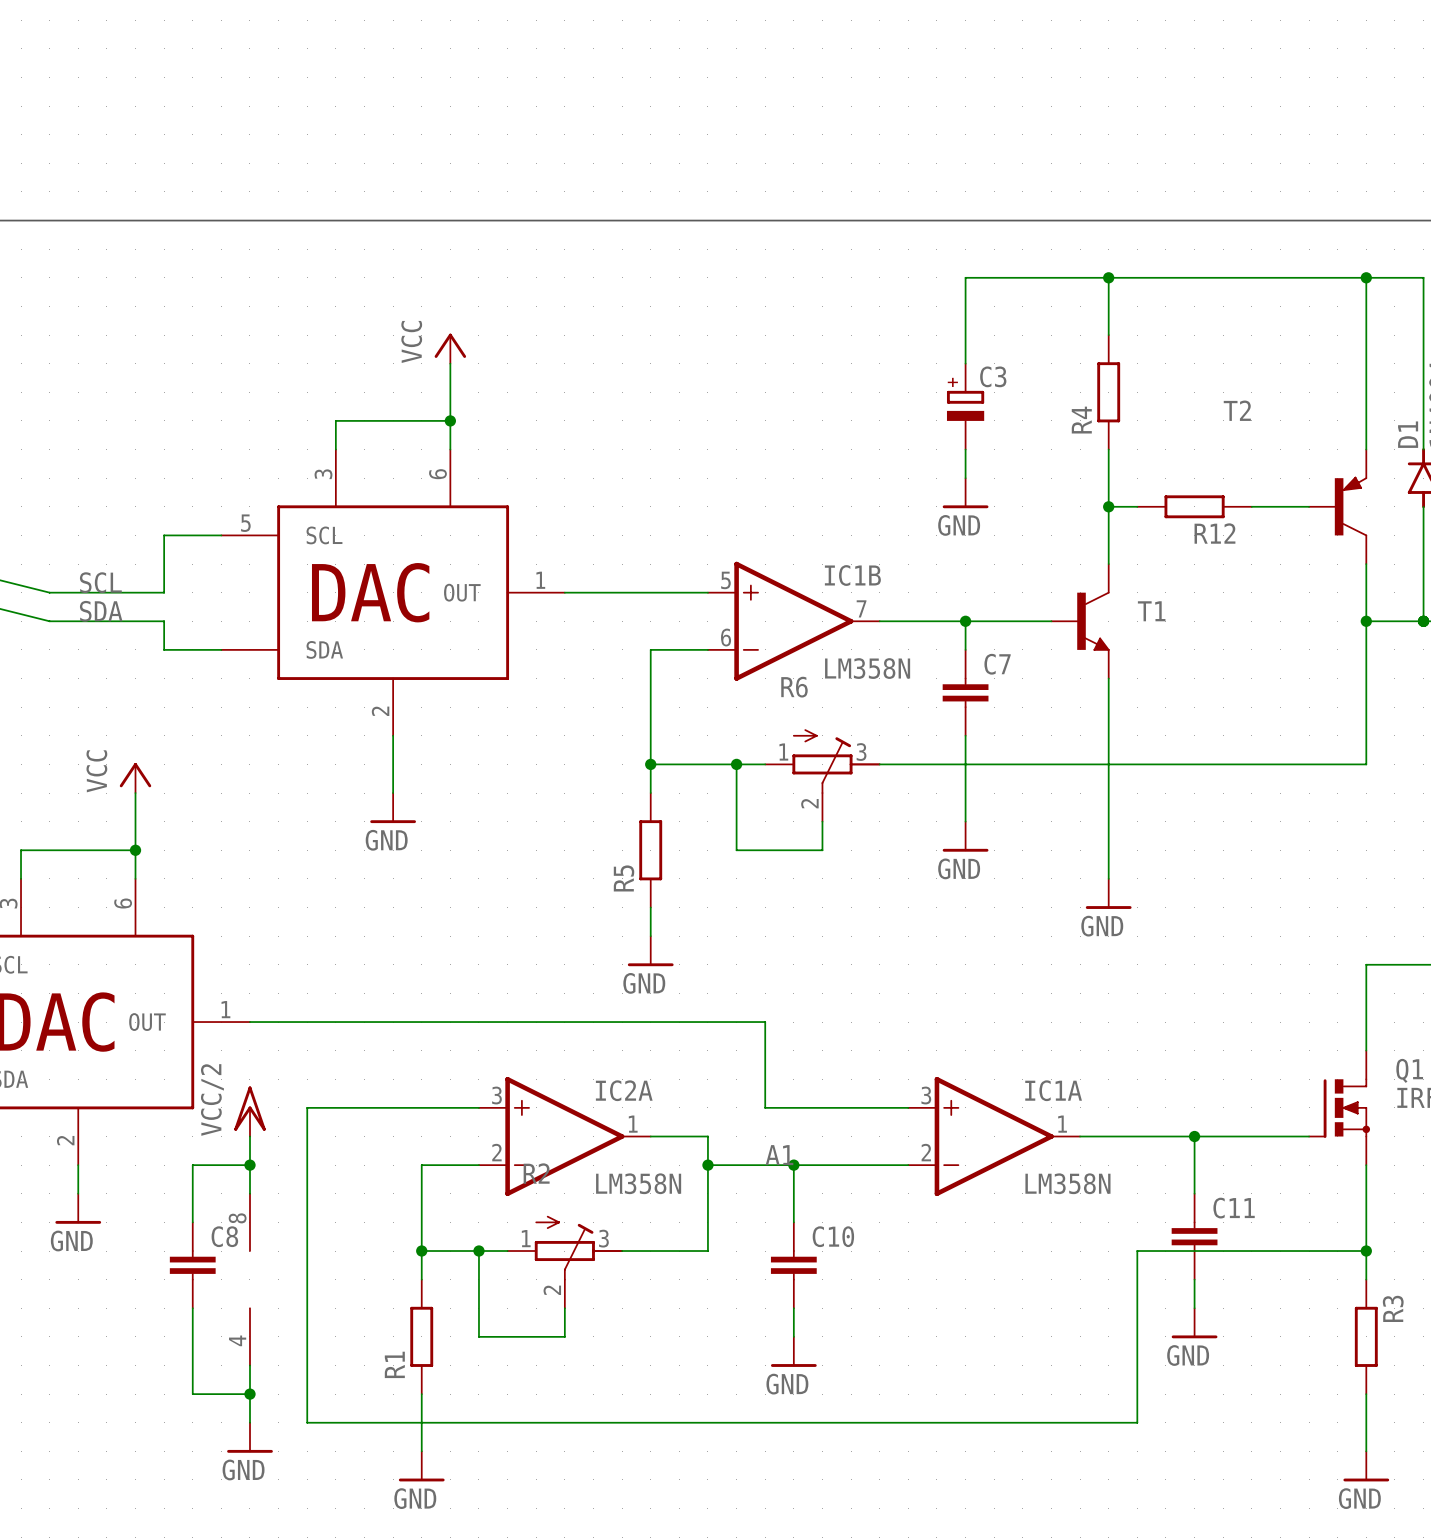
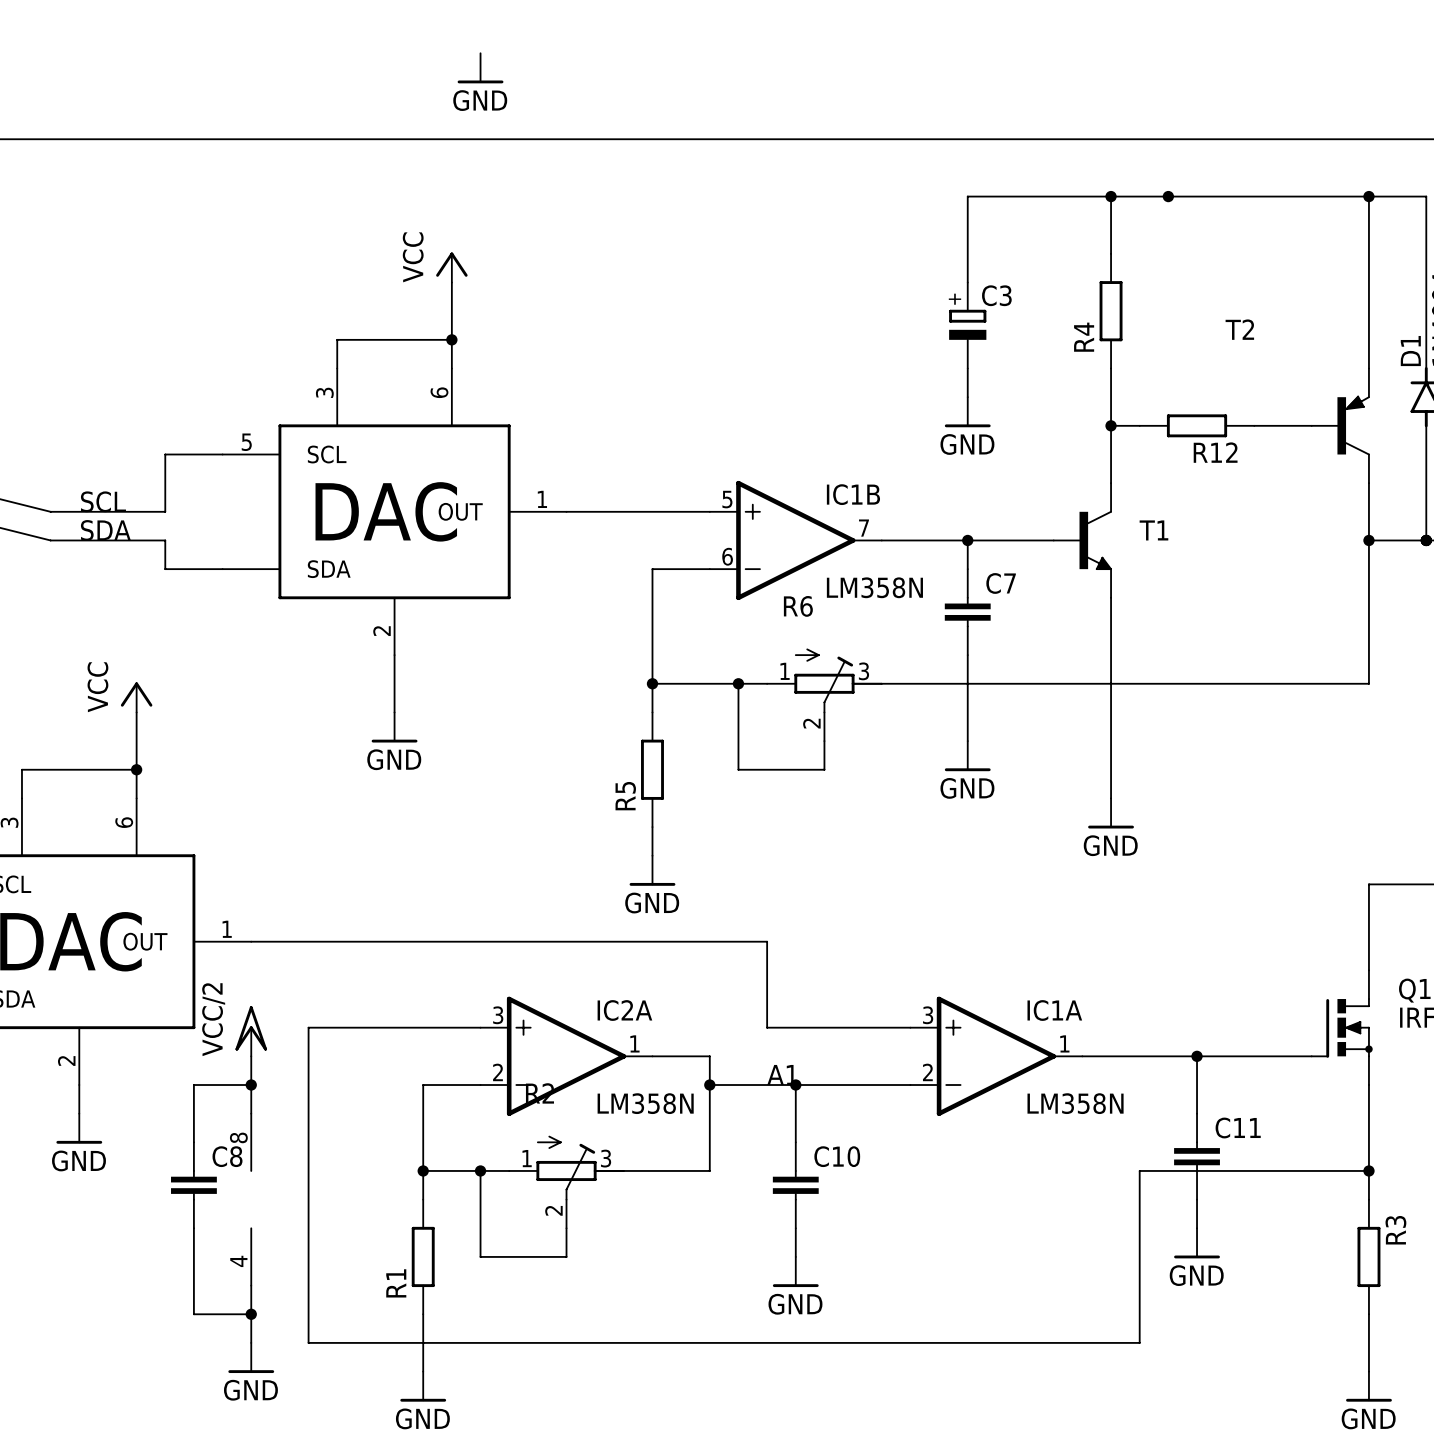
power symbol: none -> GND (480, 68)
junction: none -> (1168, 196)

